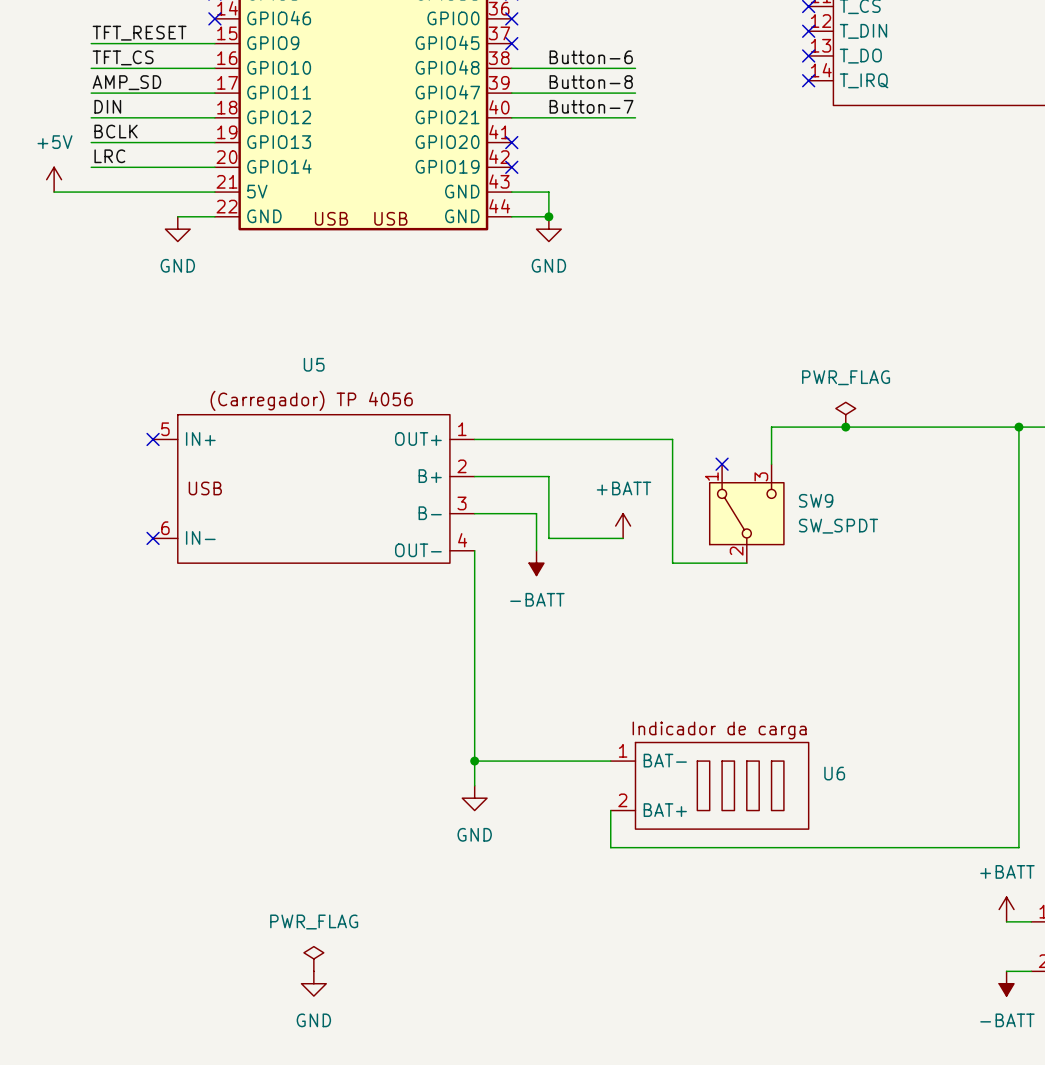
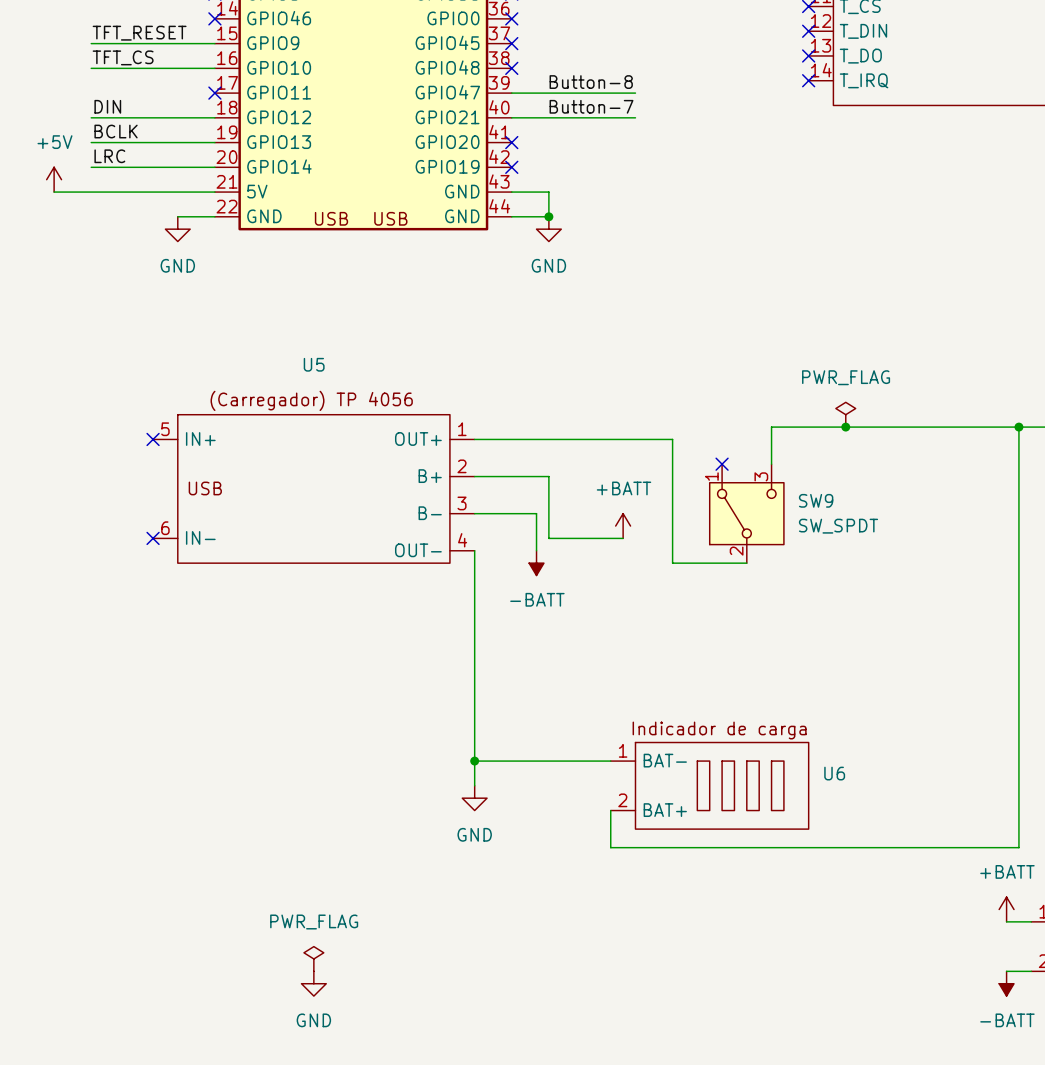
label: Button-6 (591, 57) -> none
wire: (511, 68) (635, 68) -> none
no-connect mark: none -> (511, 68)
label: AMP_SD (126, 82) -> none
wire: (91, 93) (214, 93) -> none
no-connect mark: none -> (214, 93)

